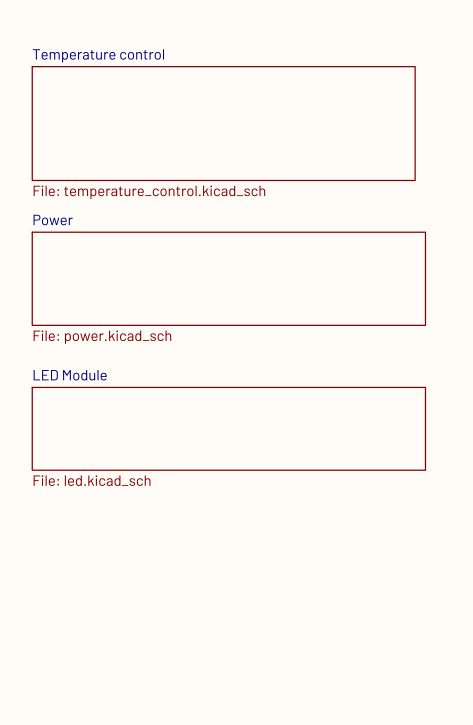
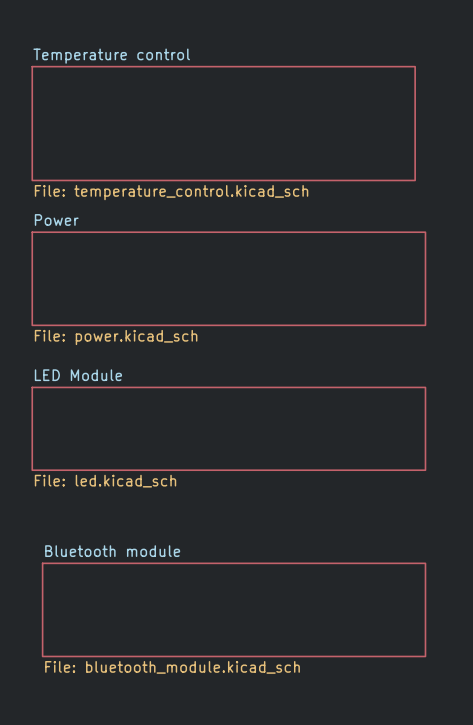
sheet Bluetooth module: none -> File: bluetooth_module.kicad_sch (234, 609)

